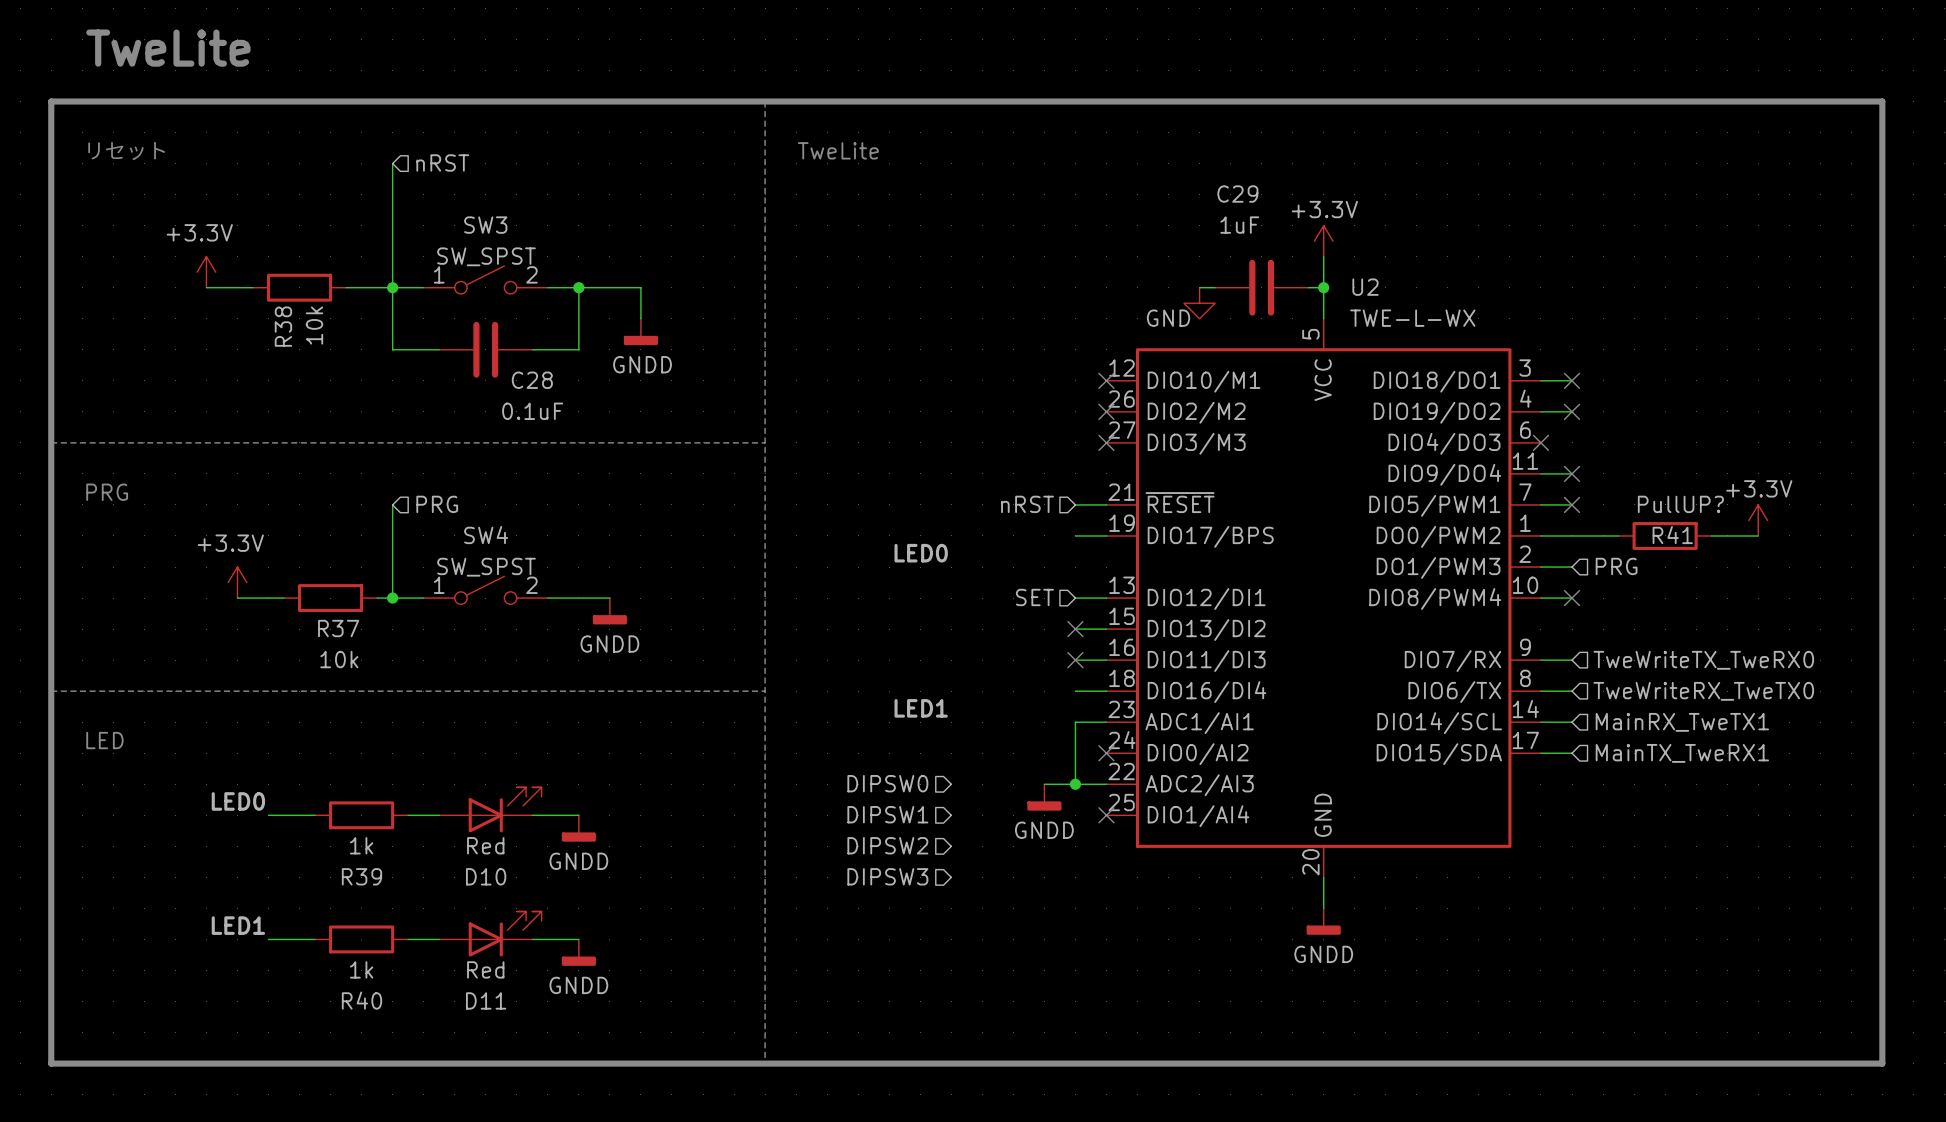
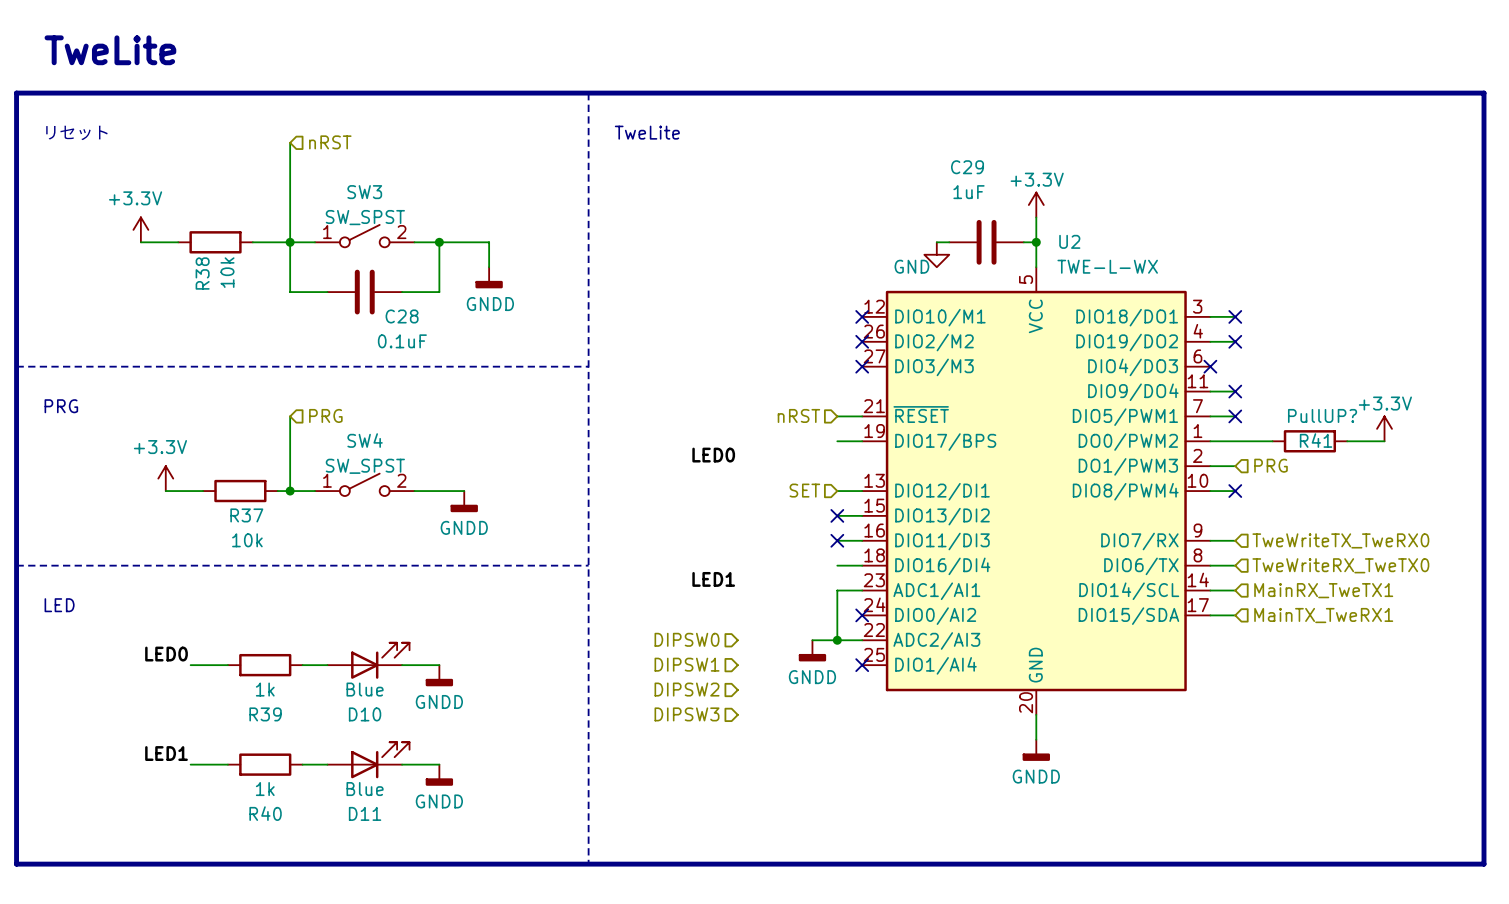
D10 value: Red (485, 845) -> Blue (365, 689)
D11 value: Red (485, 969) -> Blue (365, 789)

